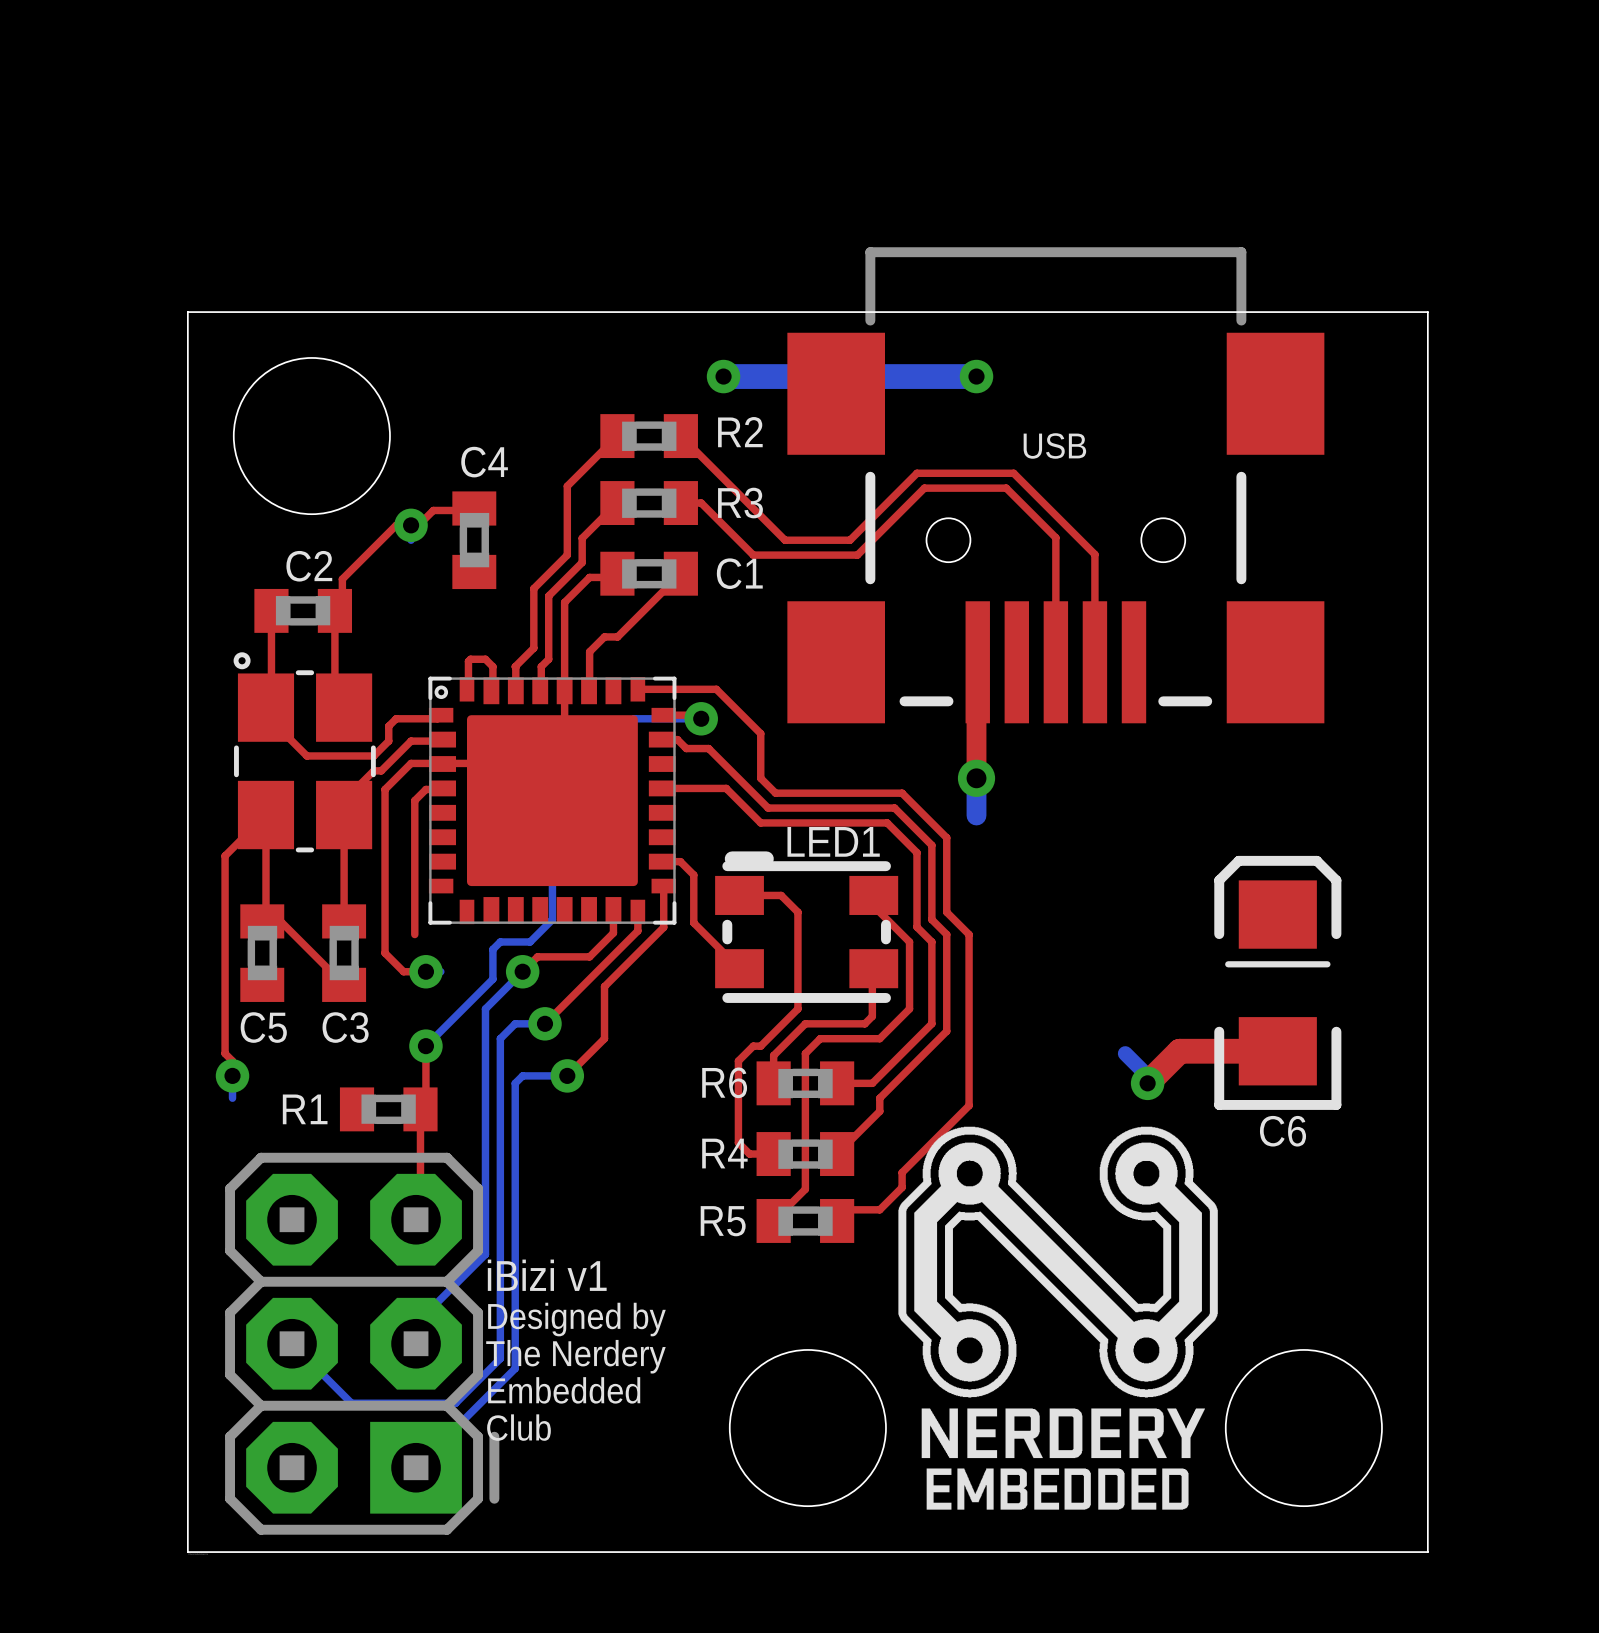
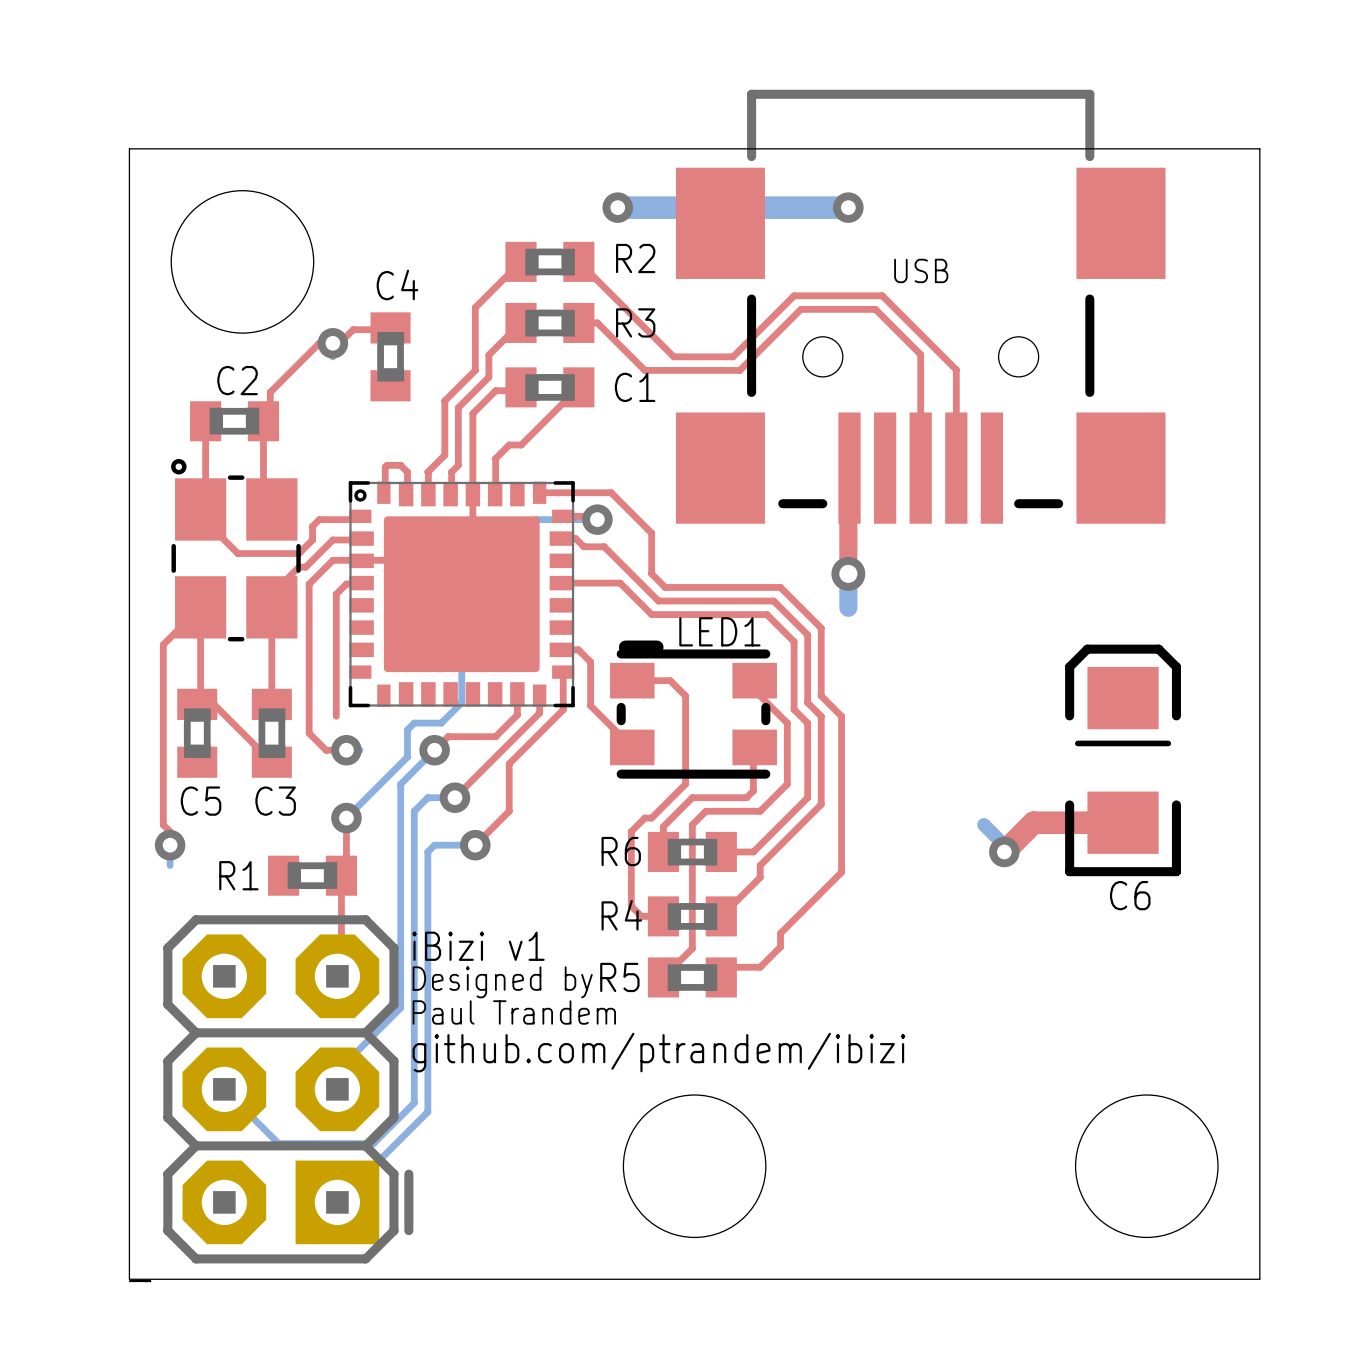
drawing: [898, 1126, 1218, 1510] -> none
text: none -> Paul Trandem (514, 1012)
text position: iBizi v1 (547, 1275) -> iBizi v1 (478, 946)
text: none -> github.com/ptrandem/ibizi (658, 1052)
text position: Designed by (576, 1319) -> Designed by (502, 982)
text: The Nerdery (575, 1356) -> none
text: Embedded (564, 1390) -> none
text: Club (518, 1427) -> none

